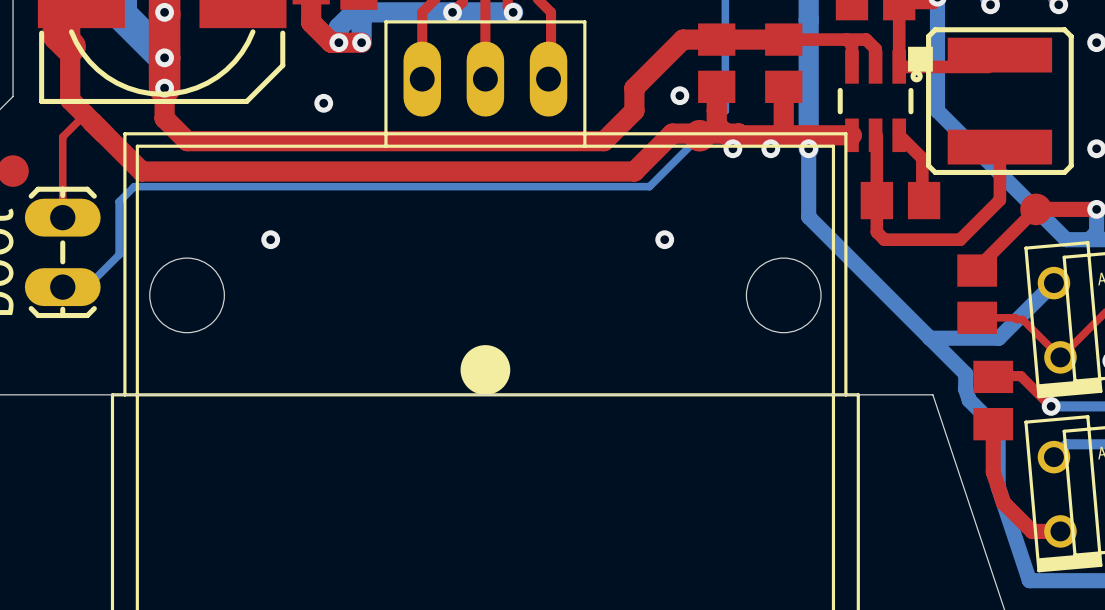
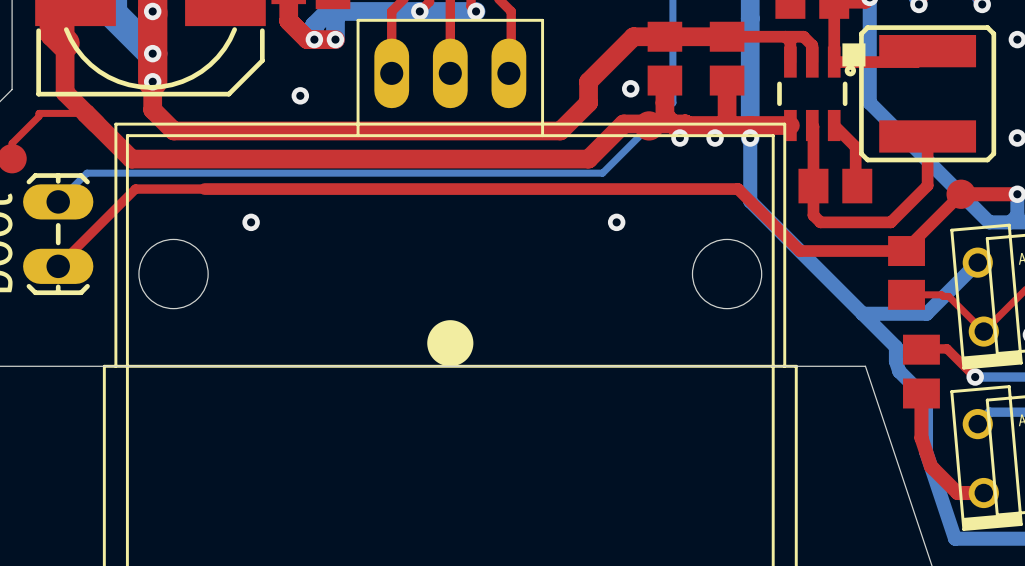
top track: (85, 114) (62, 136) (62, 217) -> none
top track: none -> (85, 113) (39, 113) (39, 116) (12, 143) (12, 158)
bottom track: (134, 186) (119, 201) (119, 254) (86, 287) (62, 287) -> (124, 173) (86, 173) (58, 201)
top track: none -> (906, 251) (799, 251) (738, 189) (135, 189) (58, 266)

